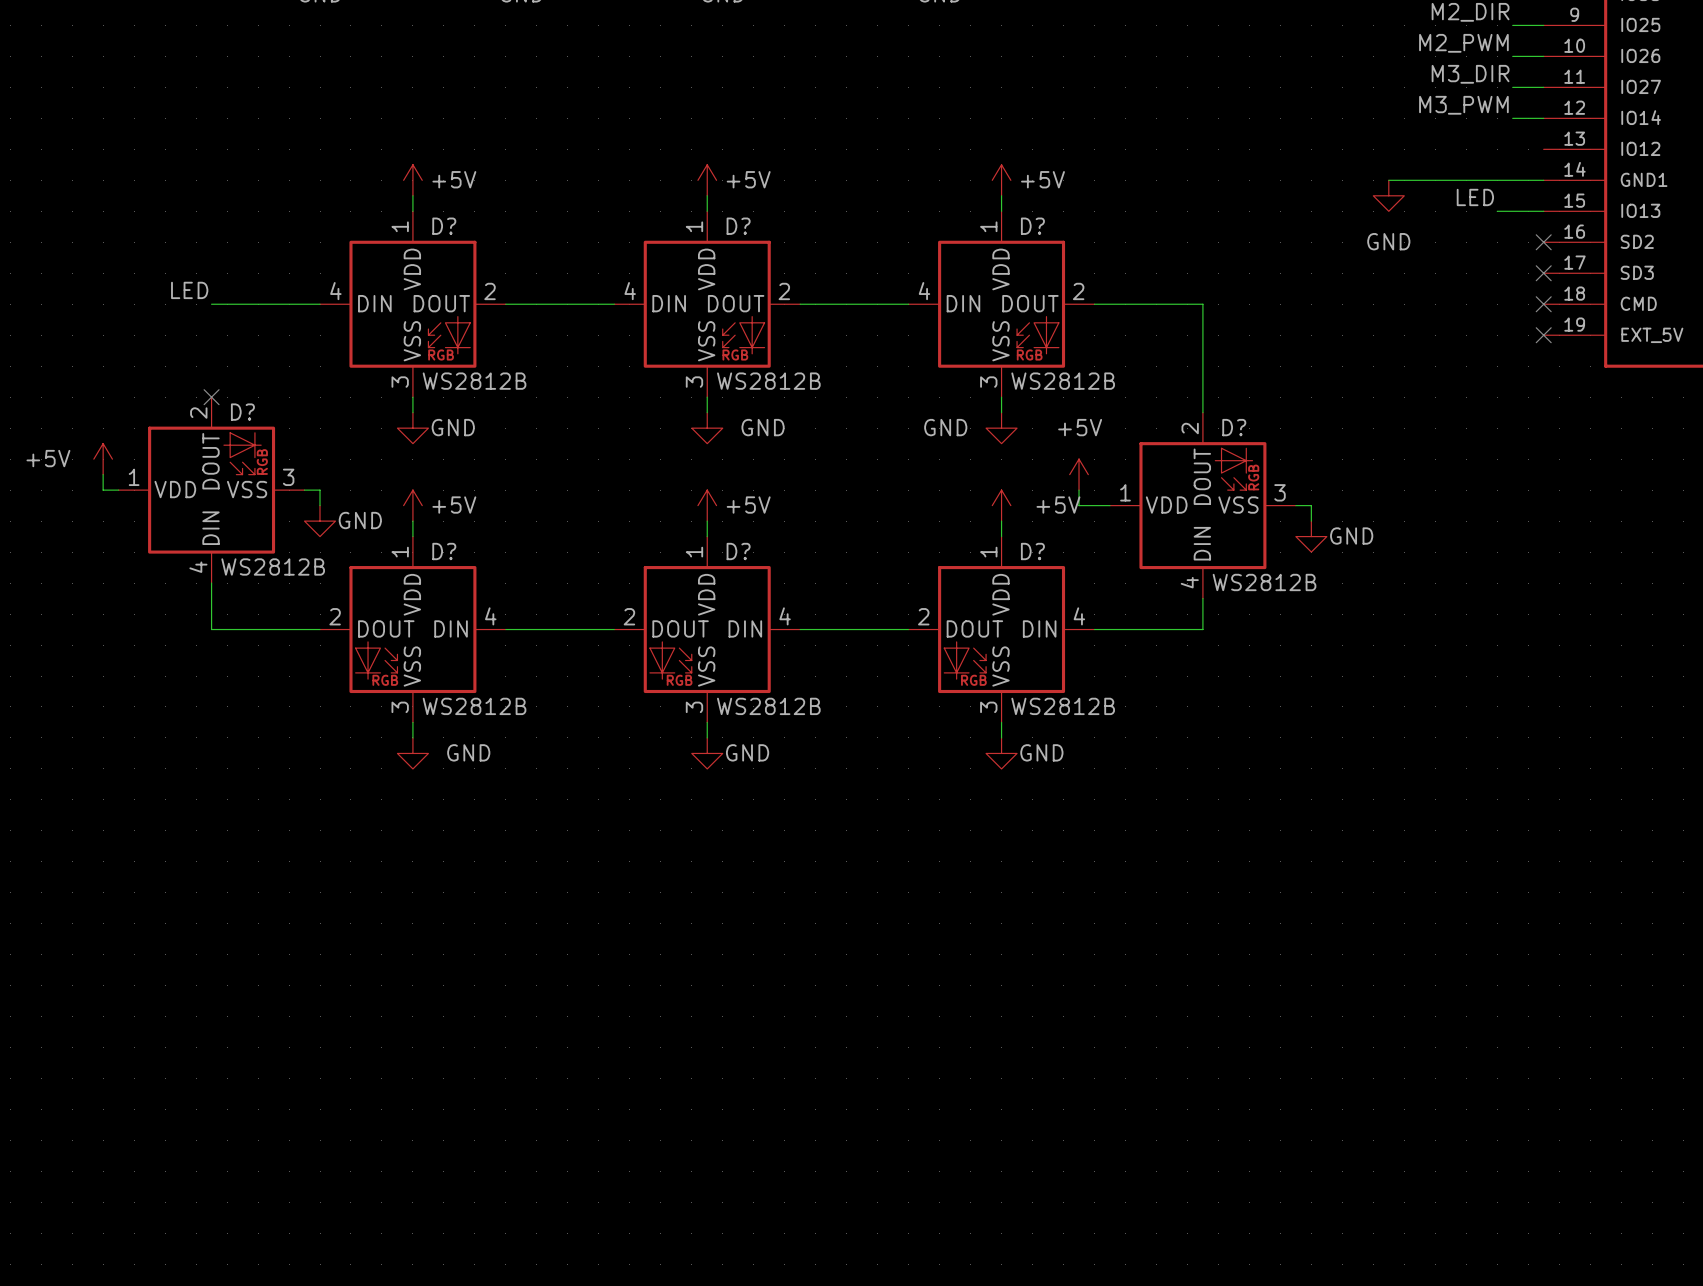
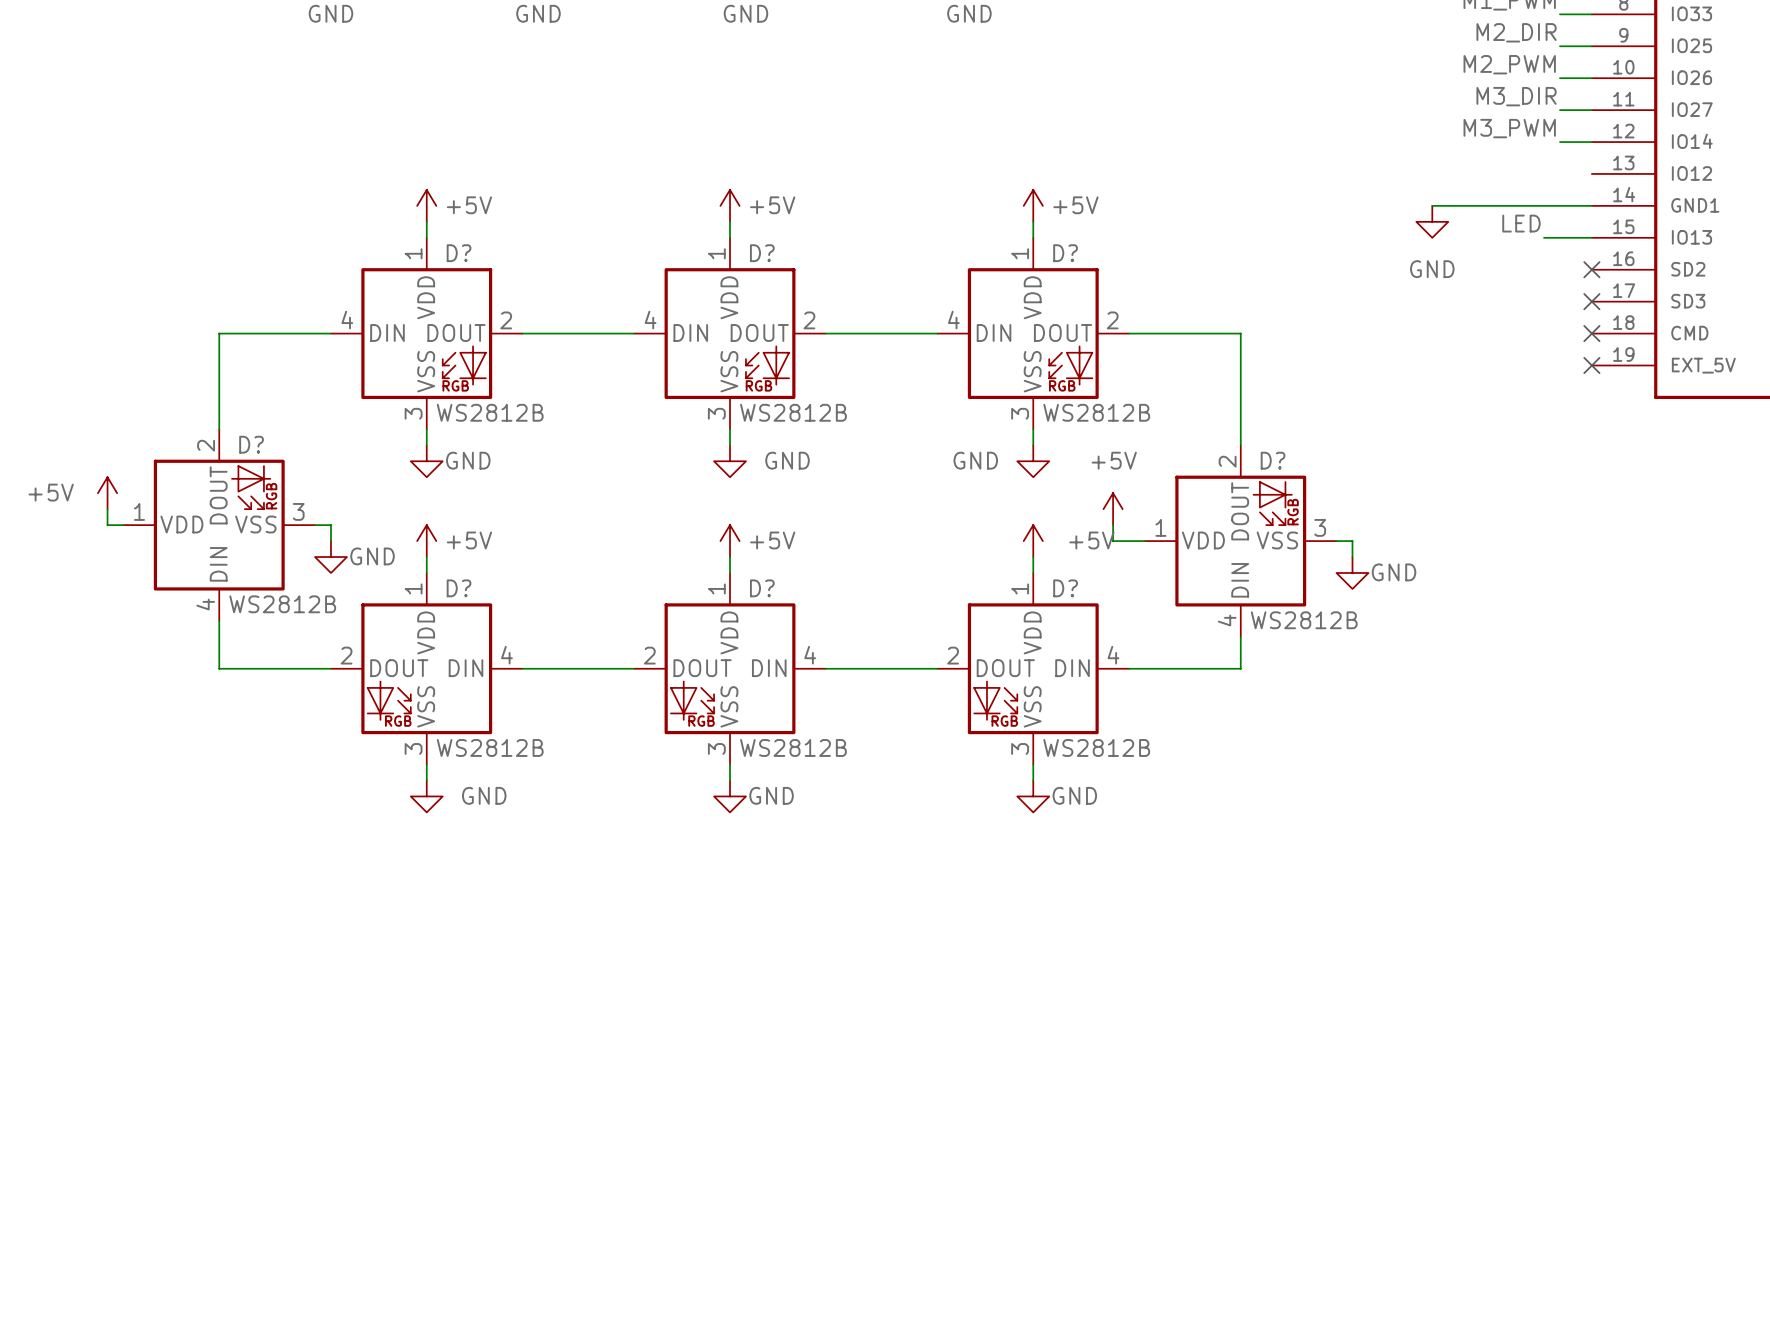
label: LED (189, 290) -> none
wire: none -> (219, 333) (219, 429)
no-connect mark: (211, 397) -> none

